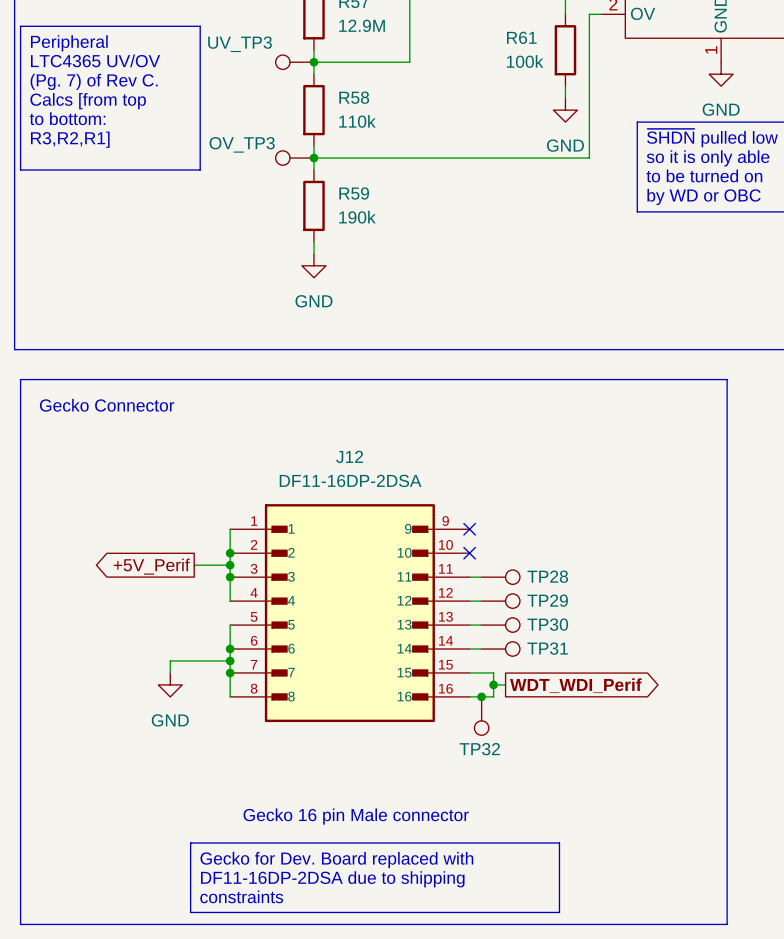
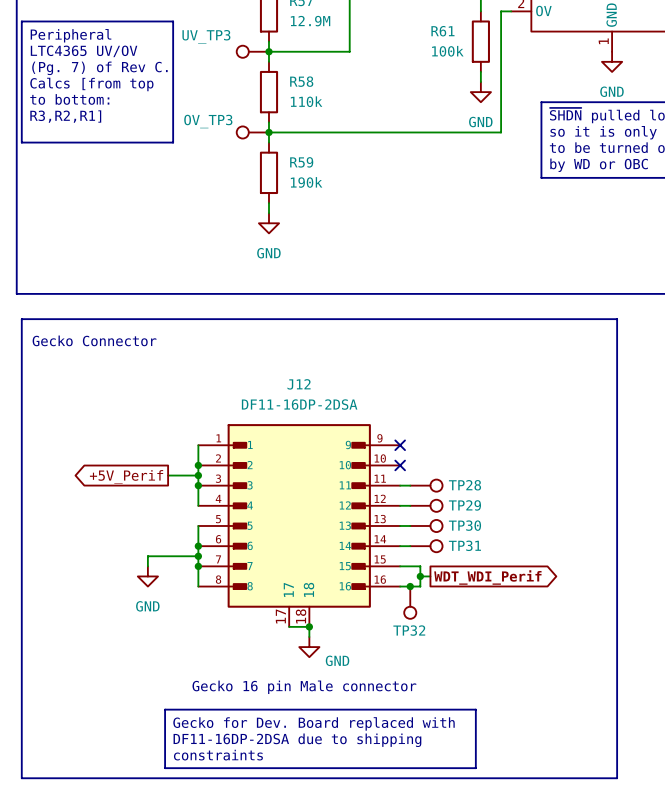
J12 symbol: [230, 504, 470, 723] -> [198, 424, 401, 627]
wire: none -> (289, 626) (309, 626) (309, 636)
junction: none -> (309, 626)
power symbol: none -> GND (309, 647)

